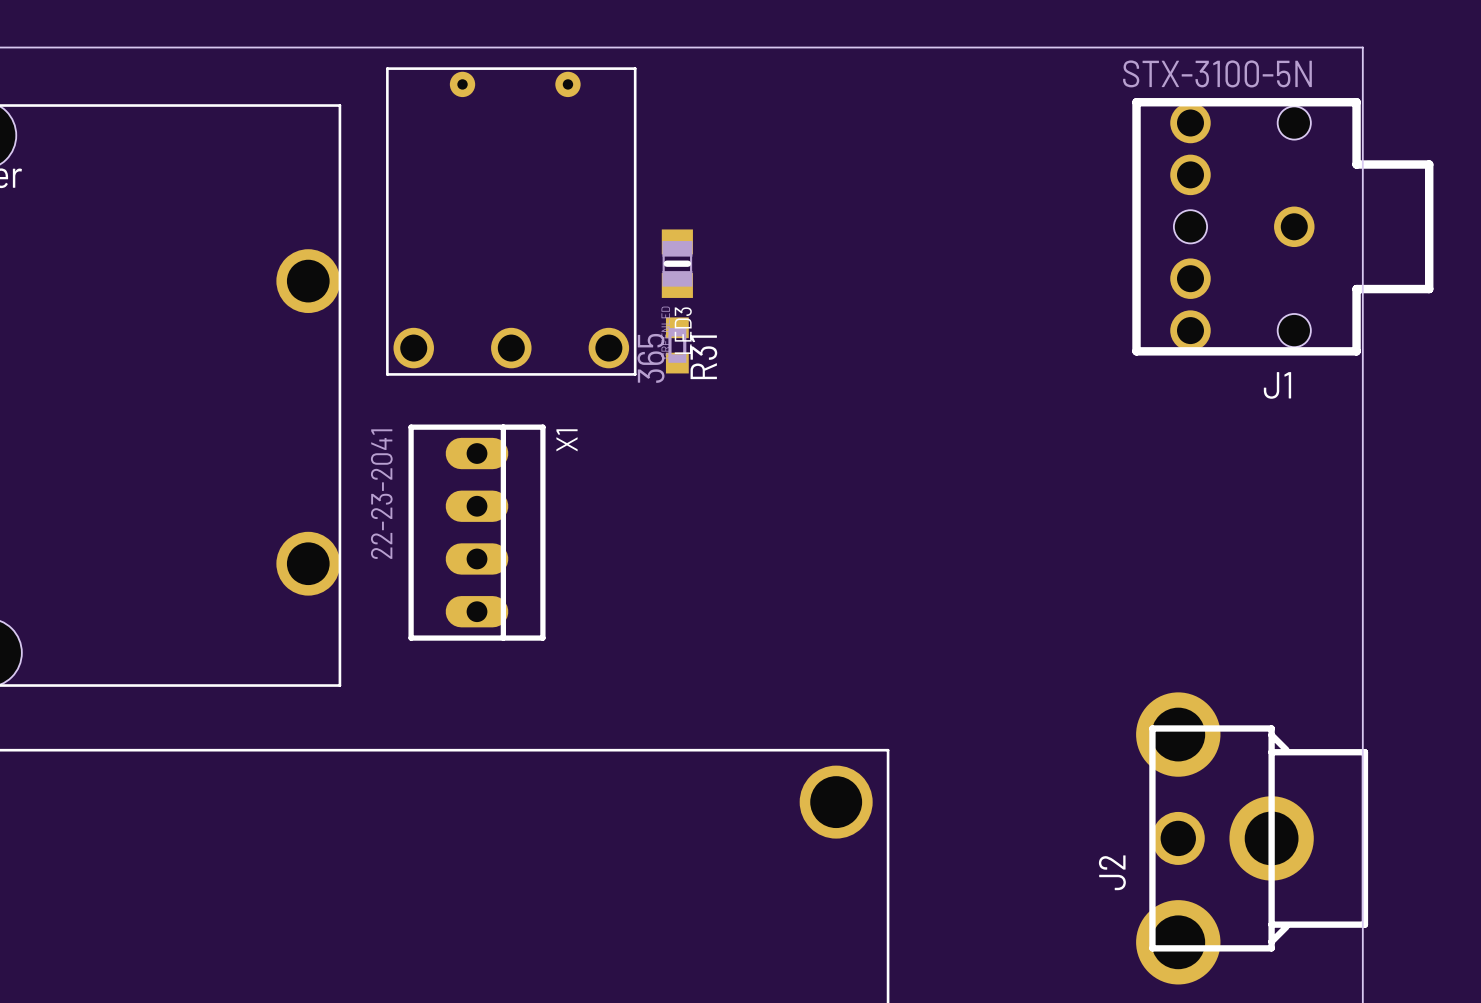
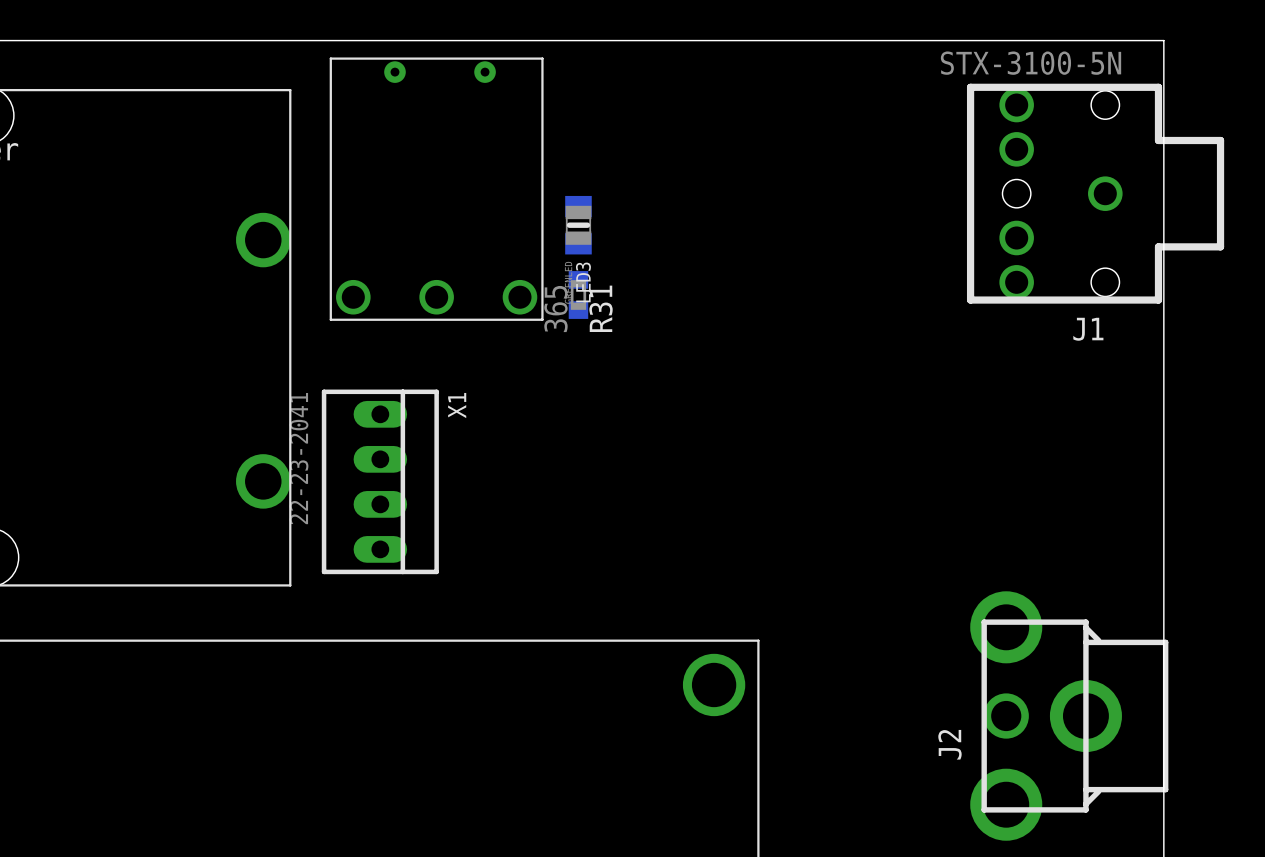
X1 position: (477, 532) -> (380, 481)

